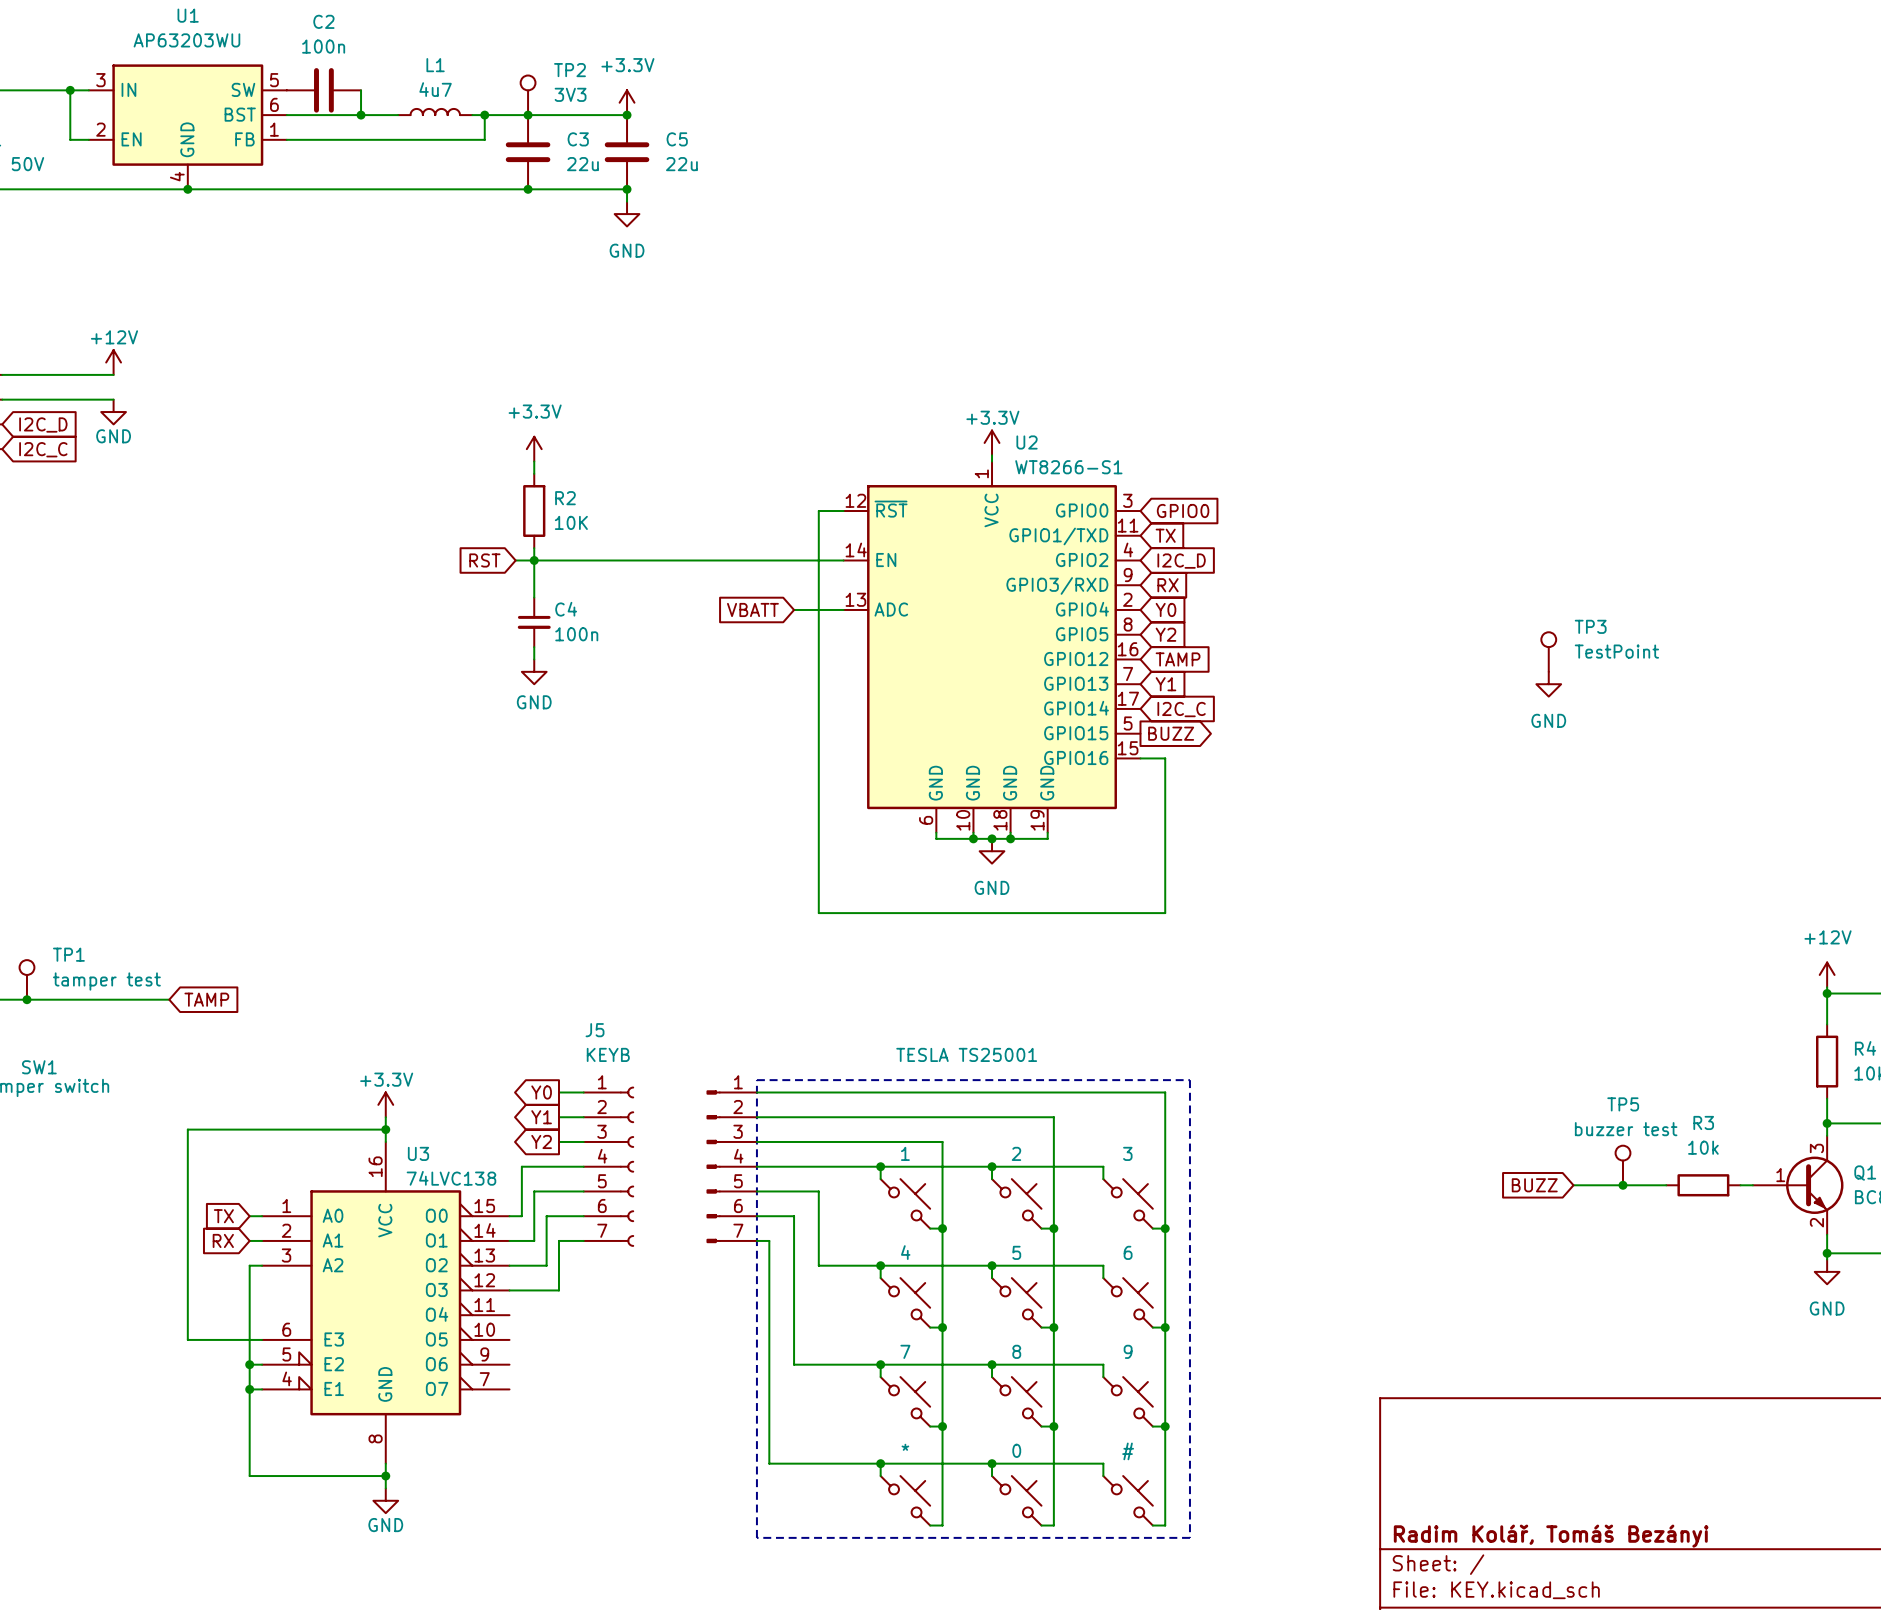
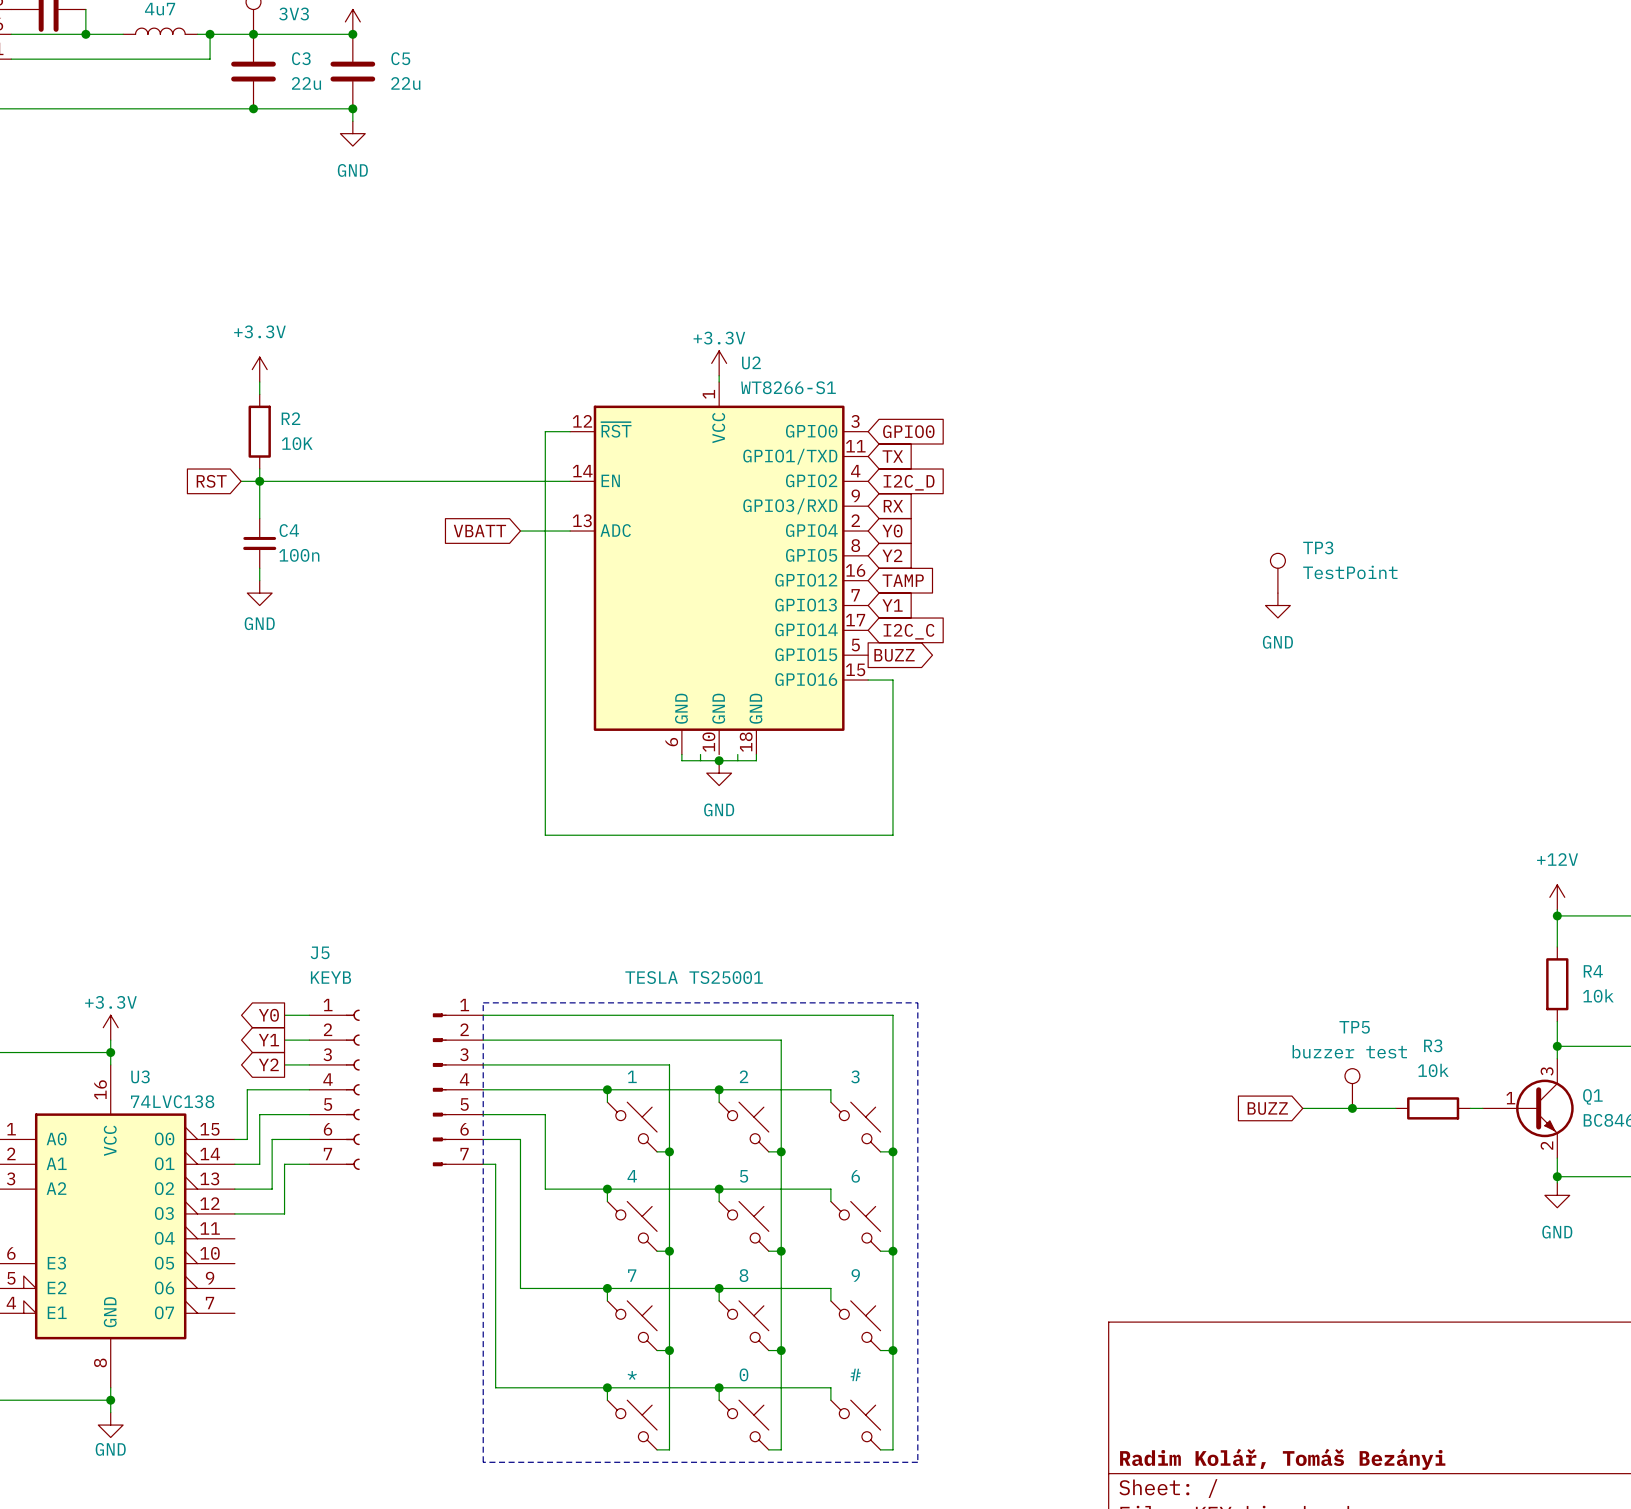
U2 symbol: [843, 461, 1141, 833] -> [570, 382, 869, 755]
wire: (936, 832) (936, 838) (954, 838) -> (681, 754) (681, 760)
wire: (1047, 832) (1047, 838) (1029, 838) -> (756, 754) (756, 760)
junction: (973, 838) -> none
junction: (1010, 838) -> none

